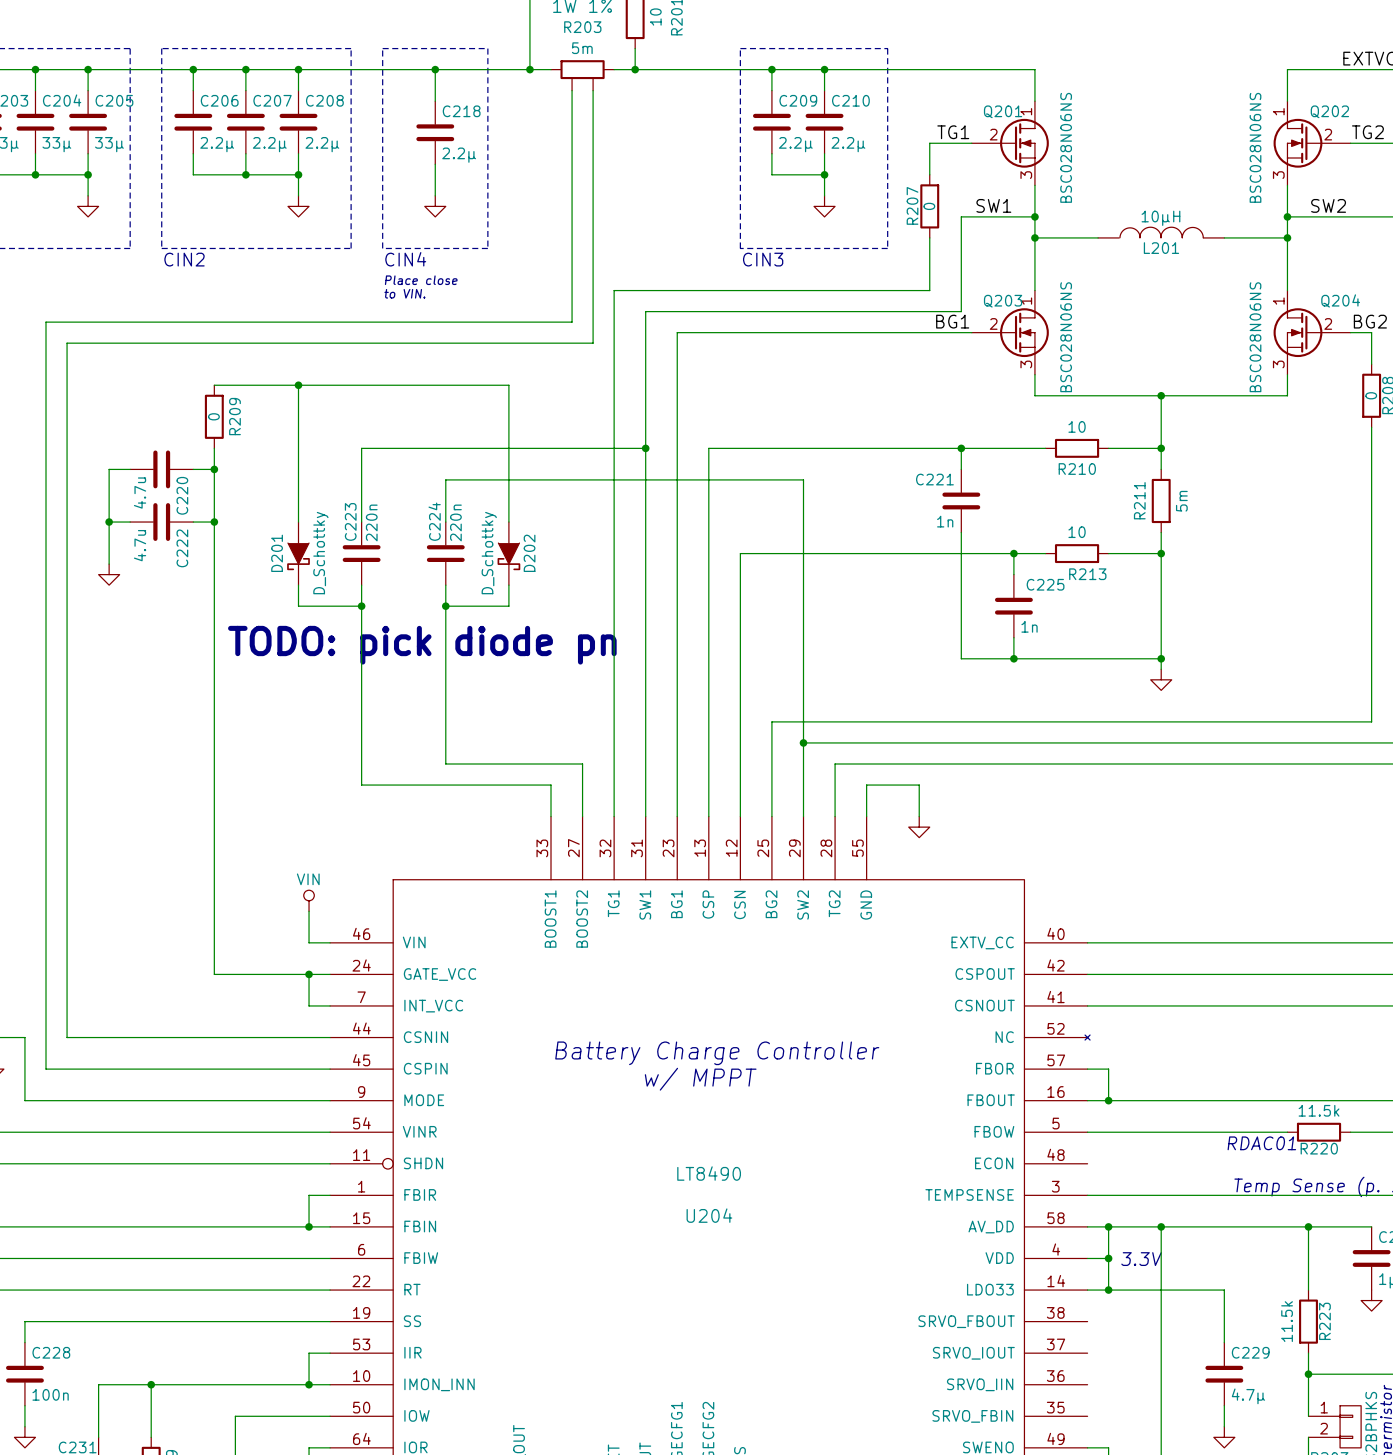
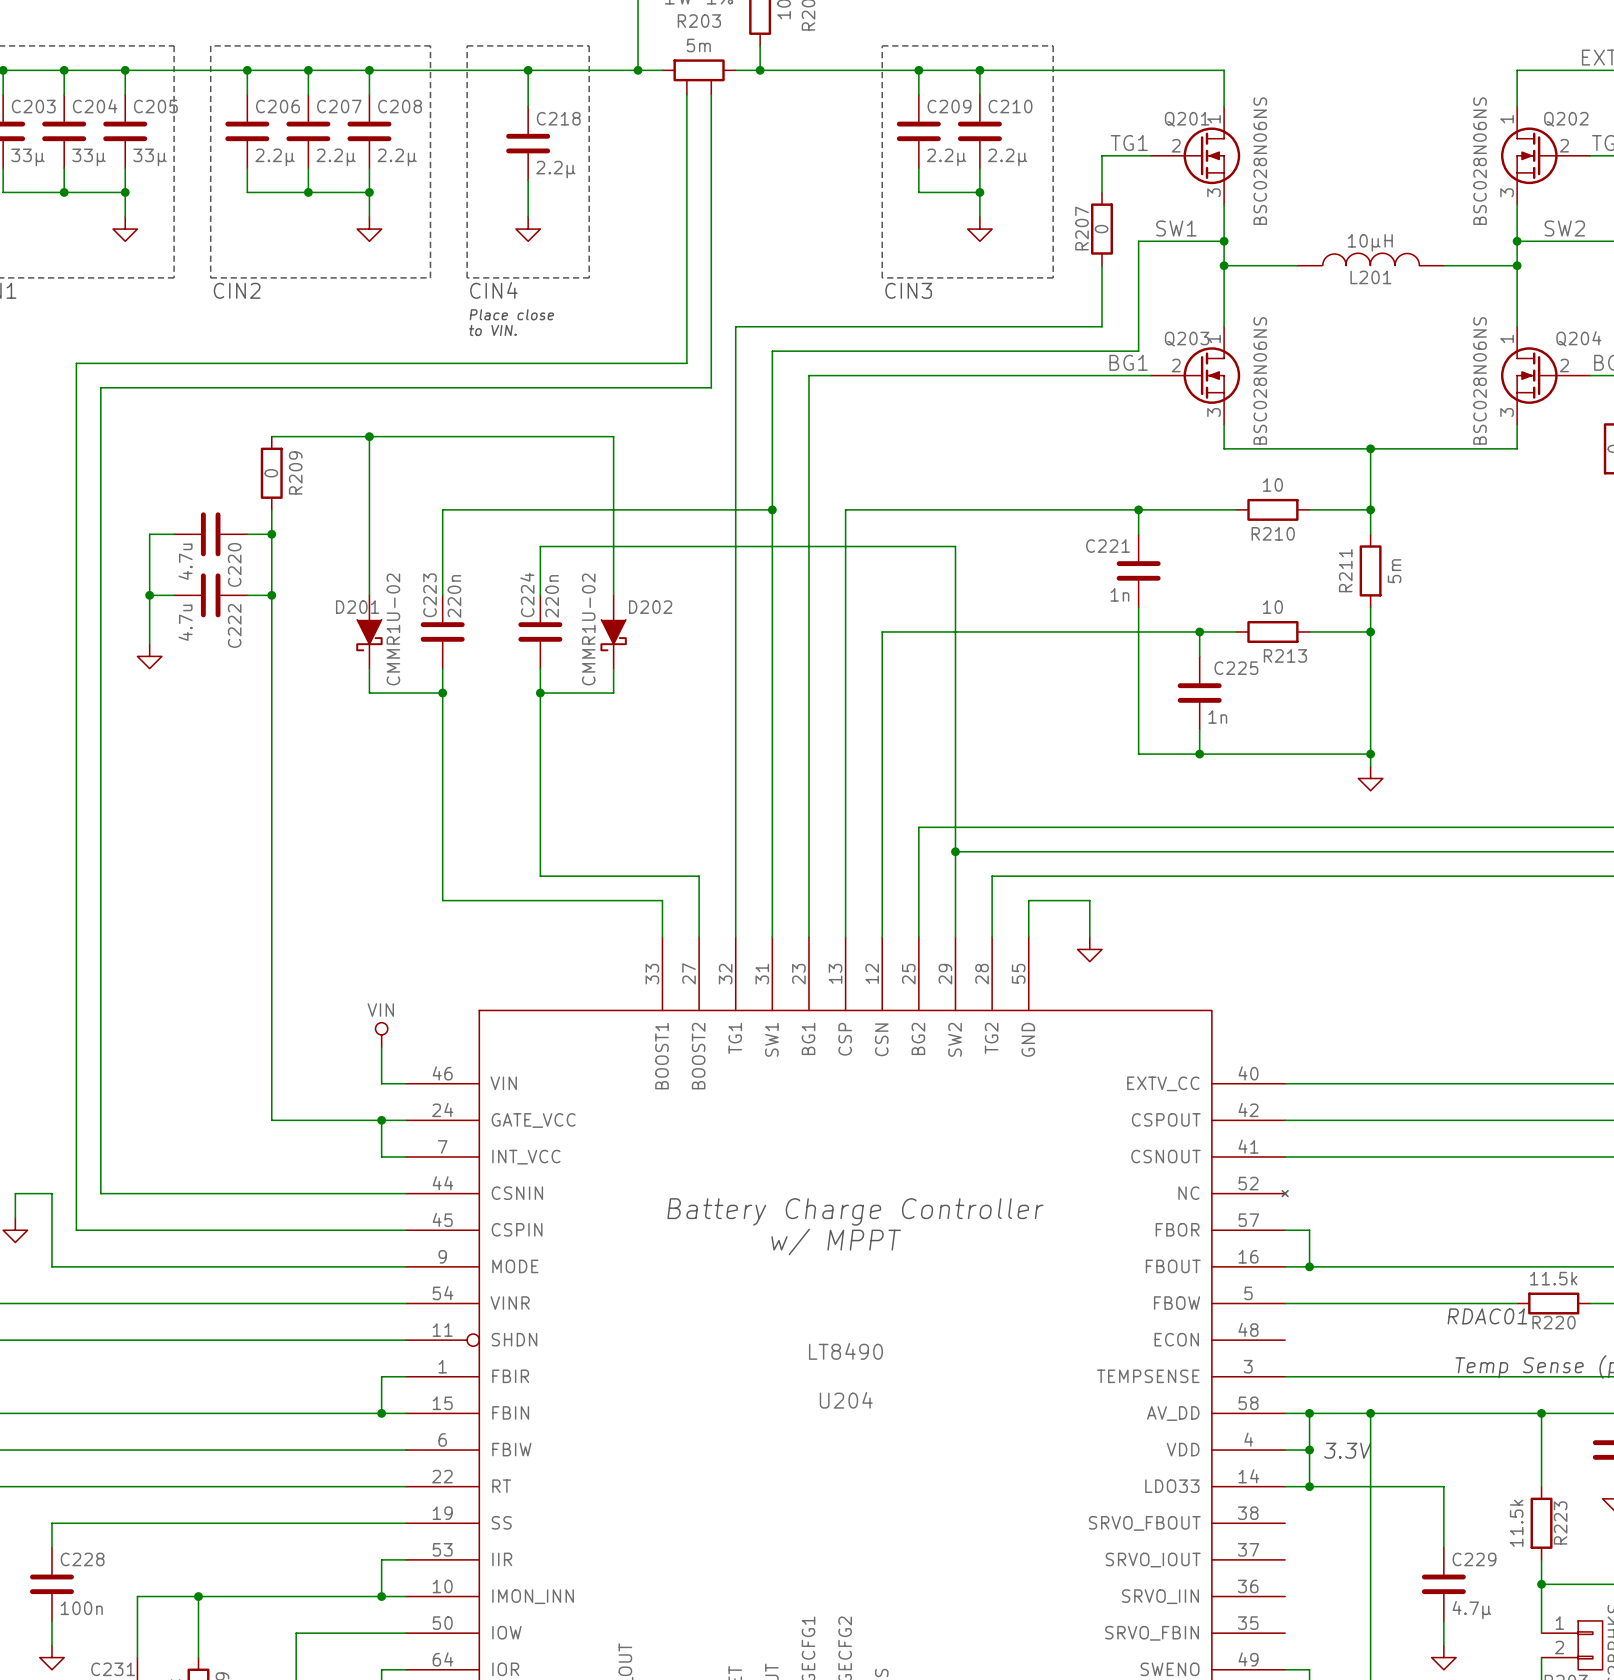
D201 name rotation: 0° (277, 553) -> 90° clockwise (357, 607)
D201 value: D_Schottky (320, 553) -> CMMR1U-02 (393, 629)
D202 value: D_Schottky (489, 553) -> CMMR1U-02 (588, 629)
D202 name position: D202 (529, 553) -> D202 (650, 607)
D202 flip: as is (508, 556) -> left-right (613, 635)
text: TODO: pick diode pn (422, 645) -> none

